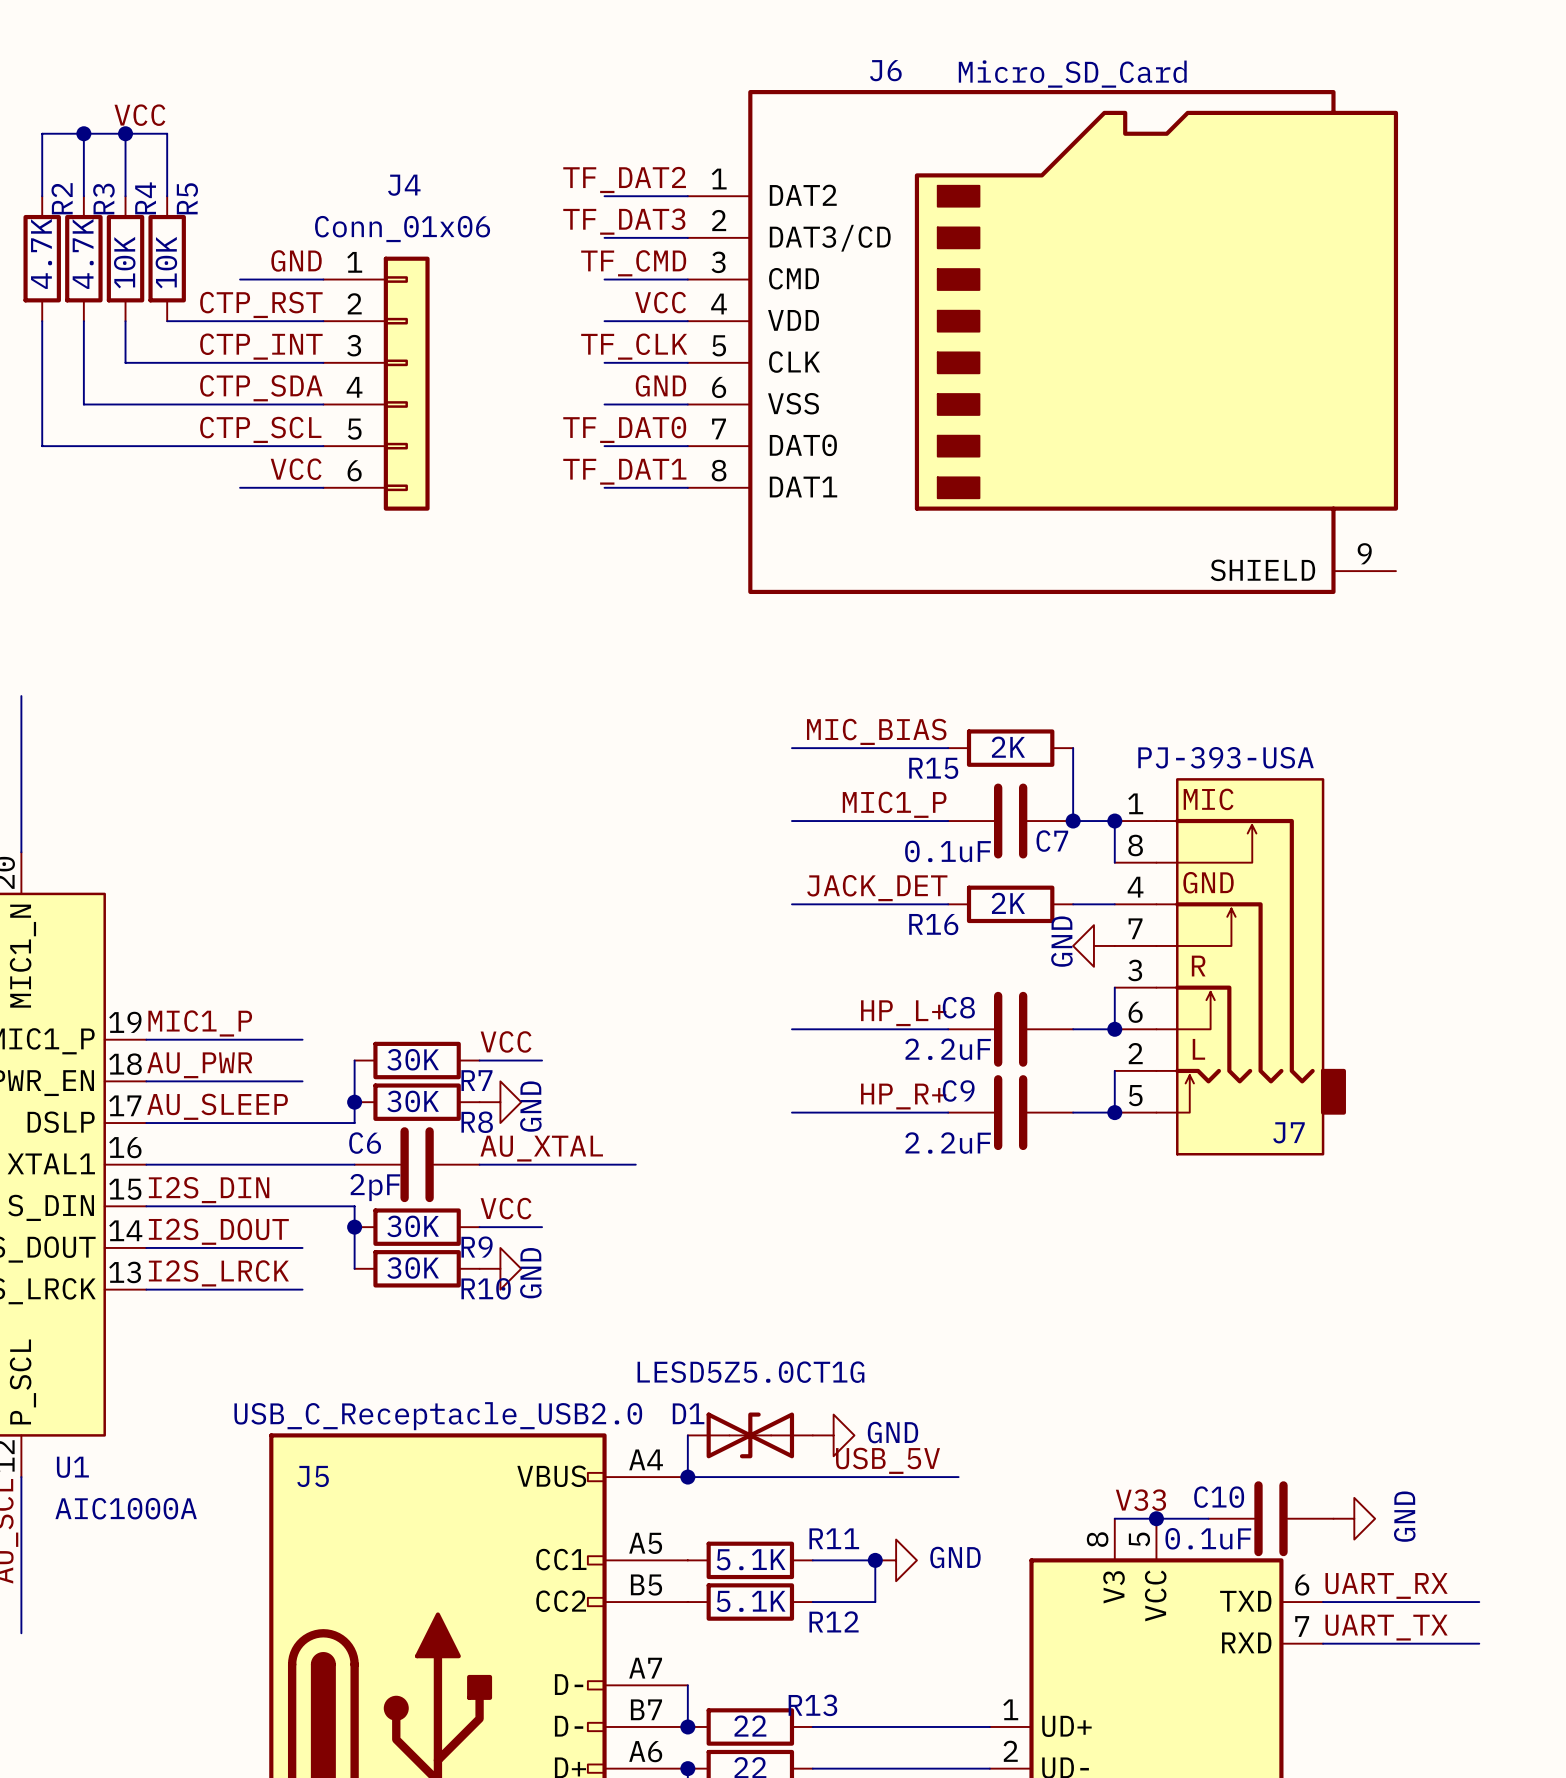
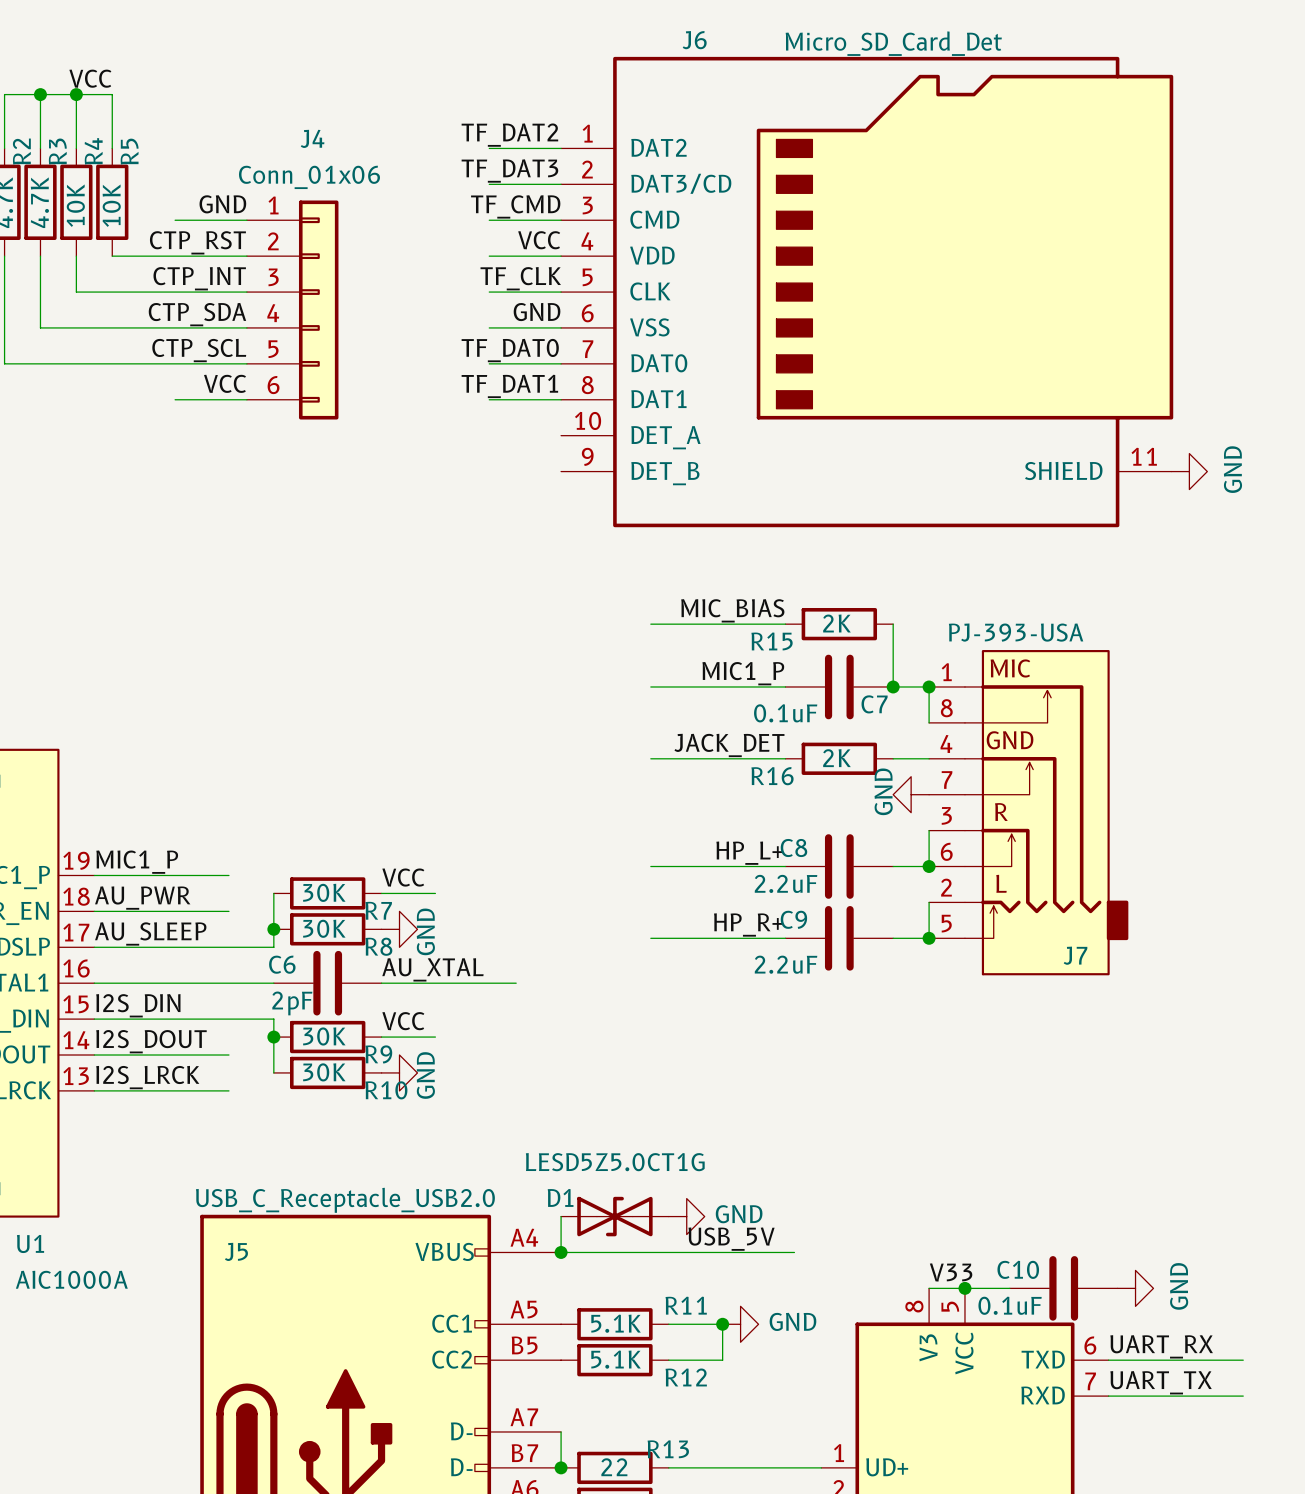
J6 name position: J6 (885, 70) -> J6 (694, 40)
J6 value: Micro_SD_Card (1072, 74) -> Micro_SD_Card_Det (893, 43)
J6 symbol: [687, 90, 1399, 595] -> [561, 56, 1174, 528]
power symbol: none -> GND (1189, 471)

